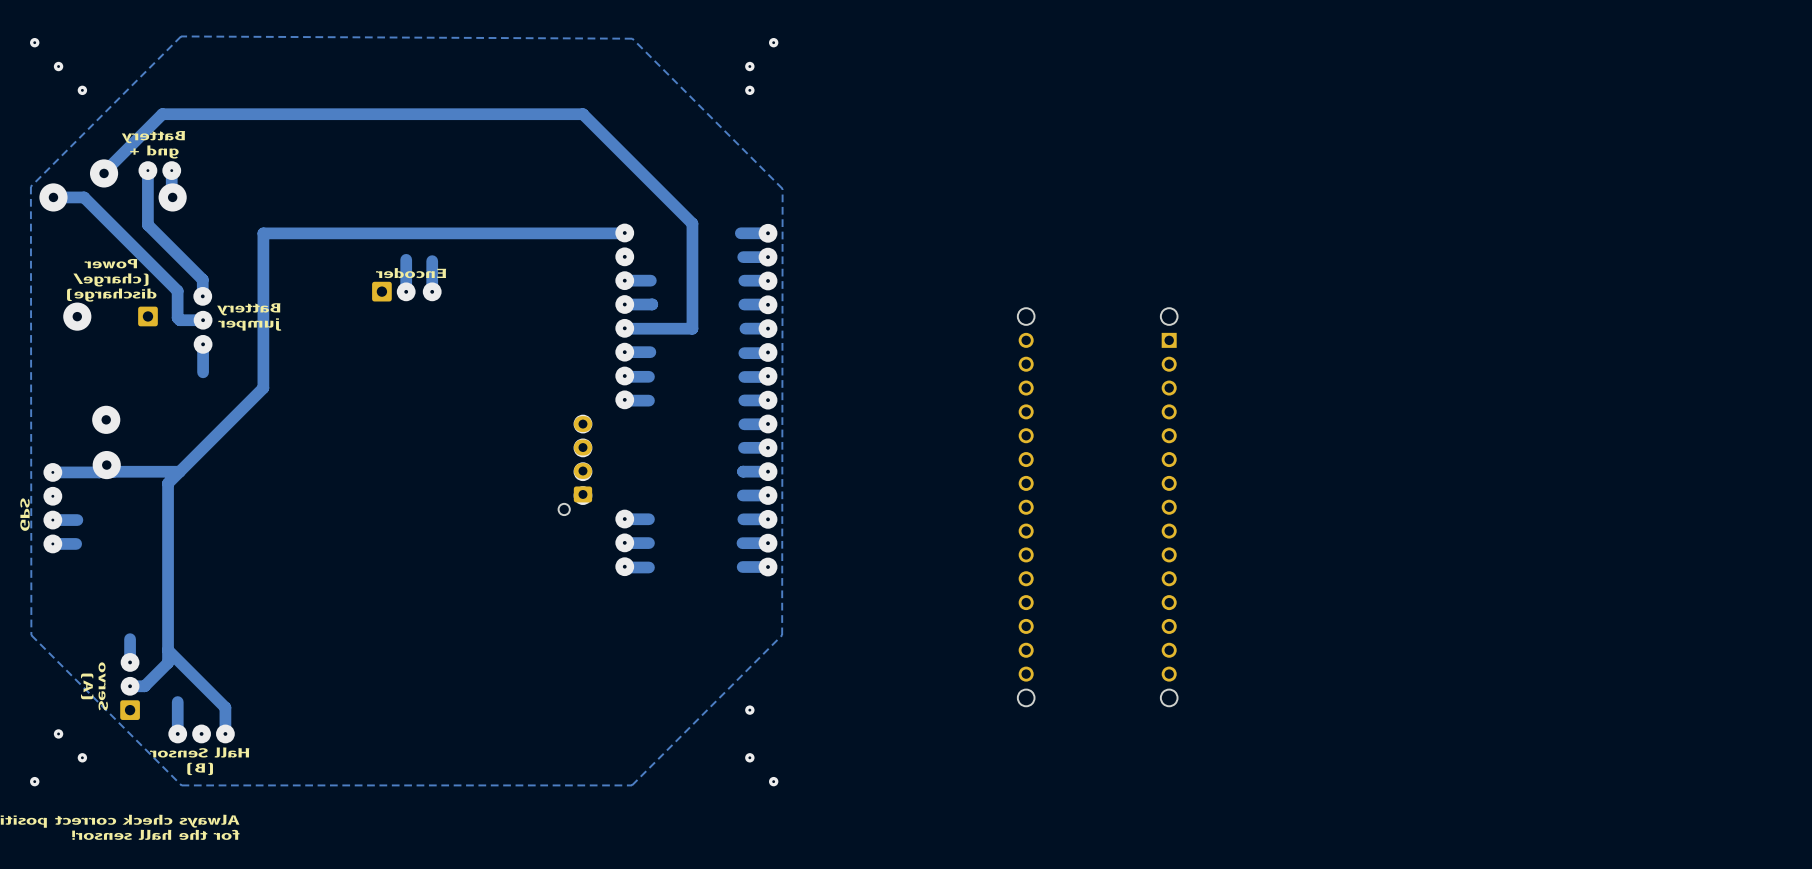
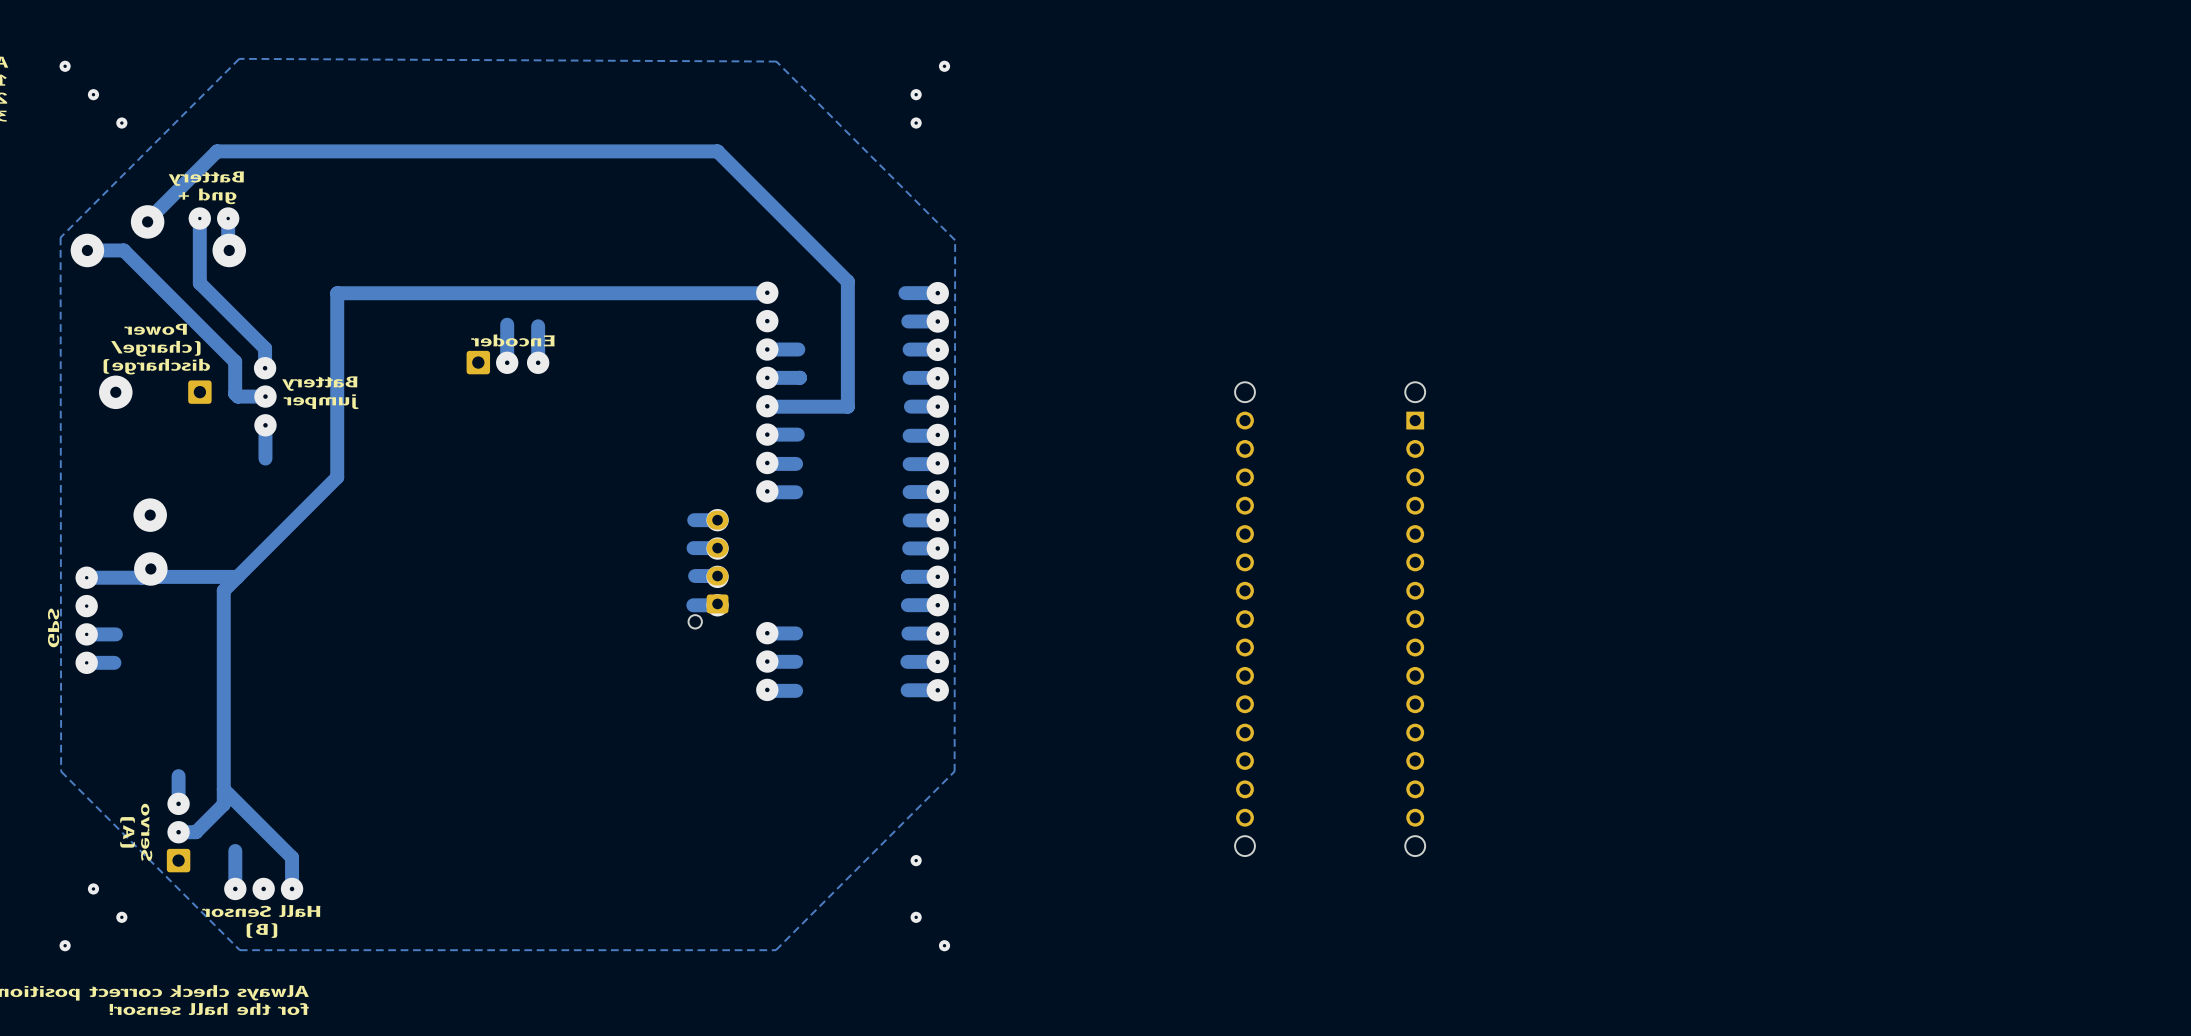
track: none -> (717, 520) (694, 520)
track: none -> (717, 548) (693, 548)
track: none -> (717, 576) (695, 576)
track: none -> (717, 605) (693, 605)

